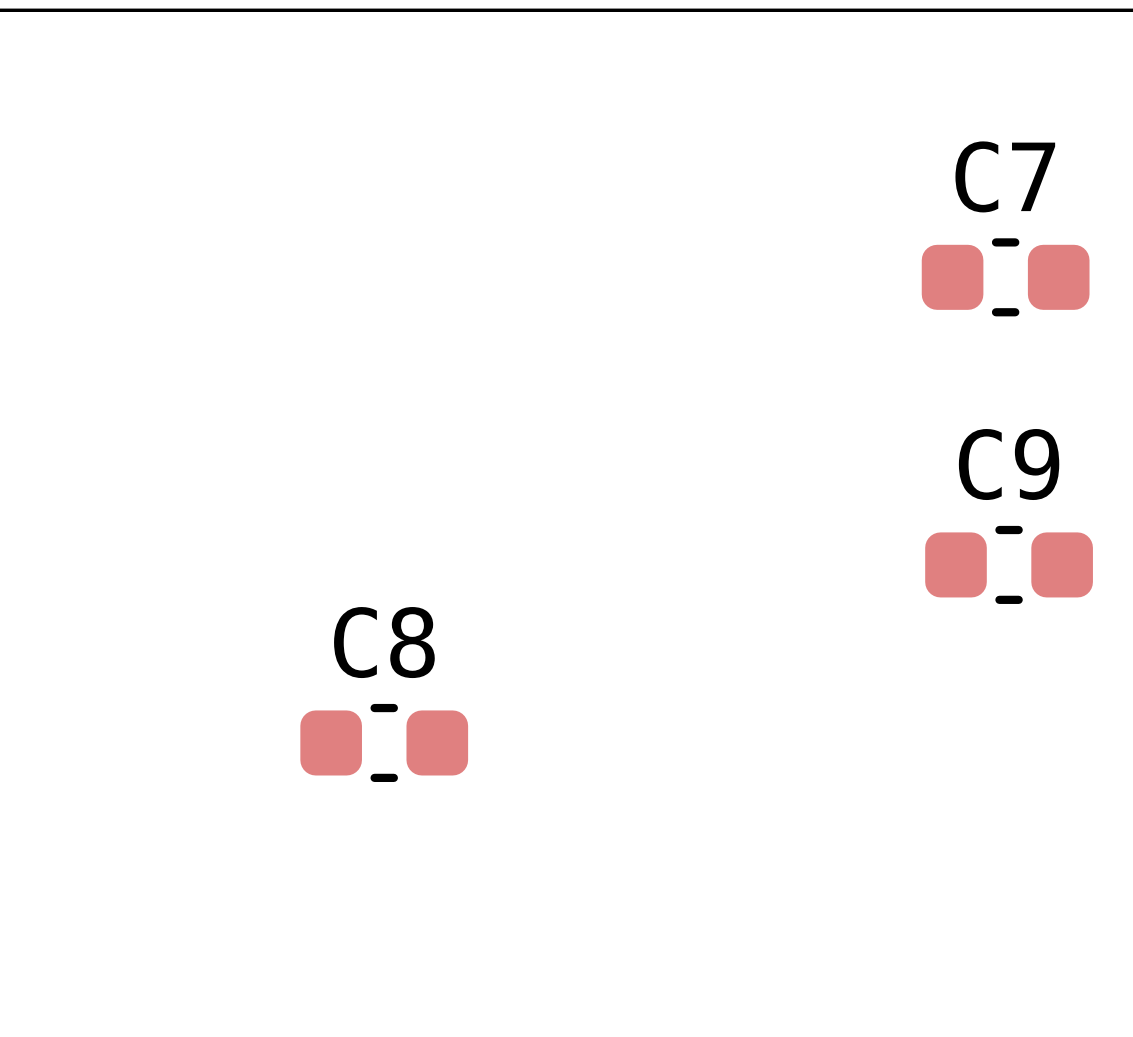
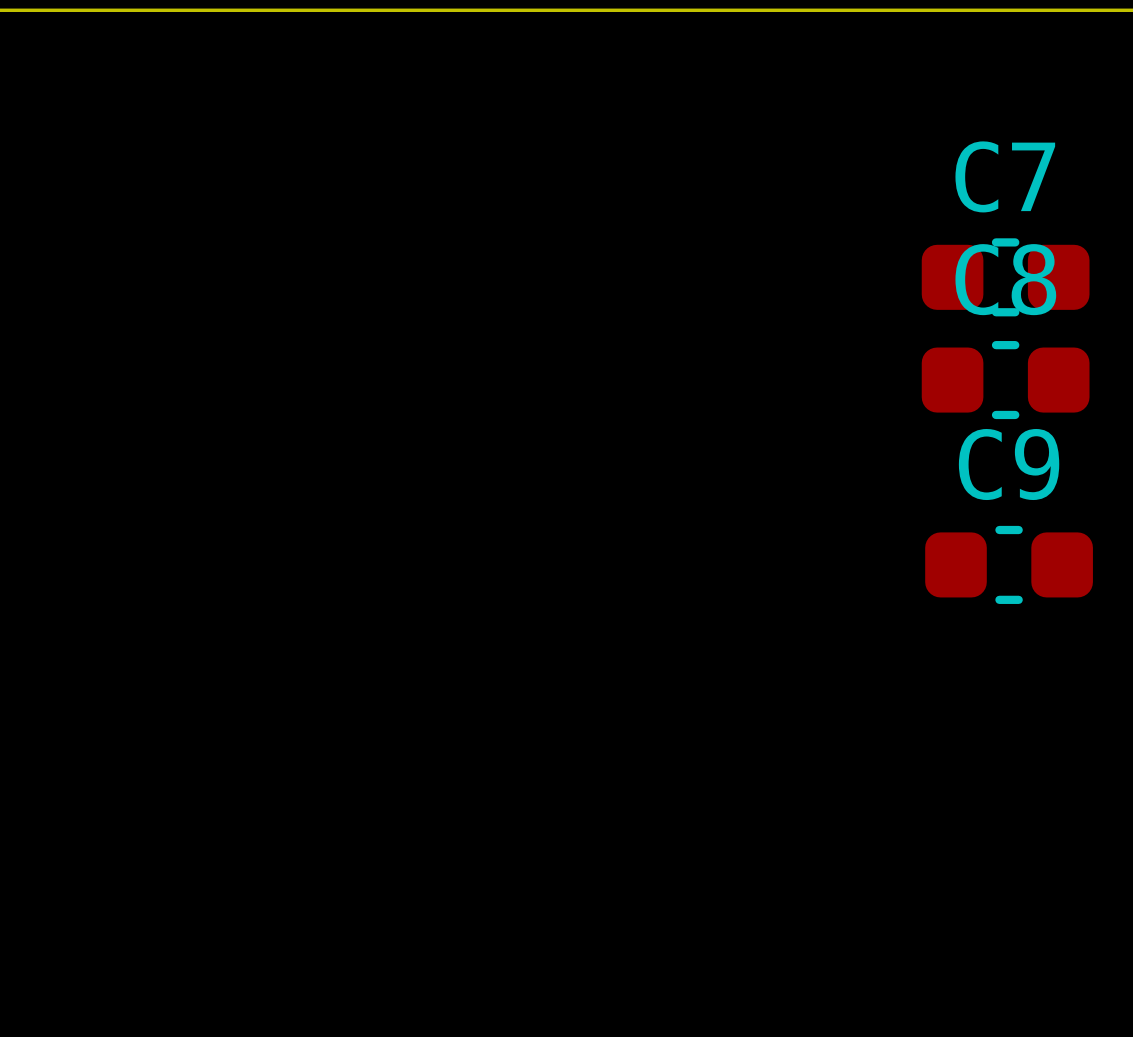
C8 position: (384, 742) -> (1005, 380)

